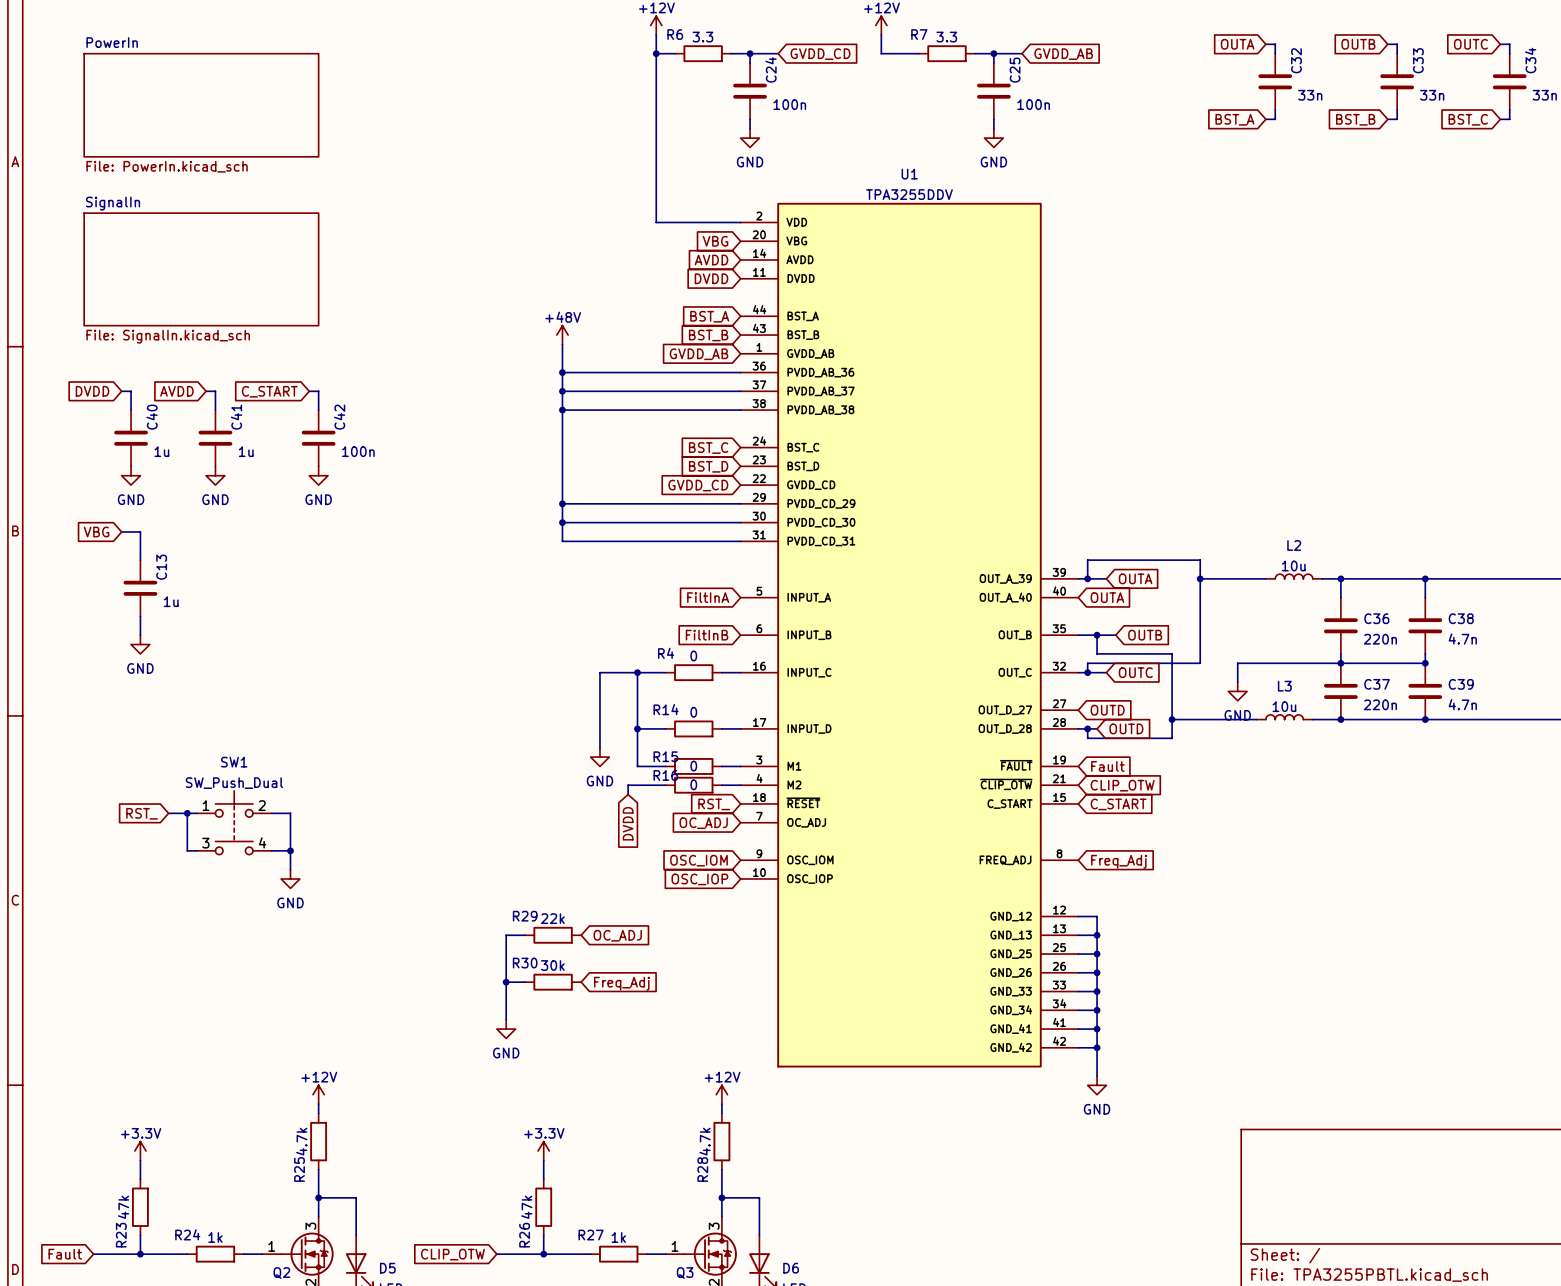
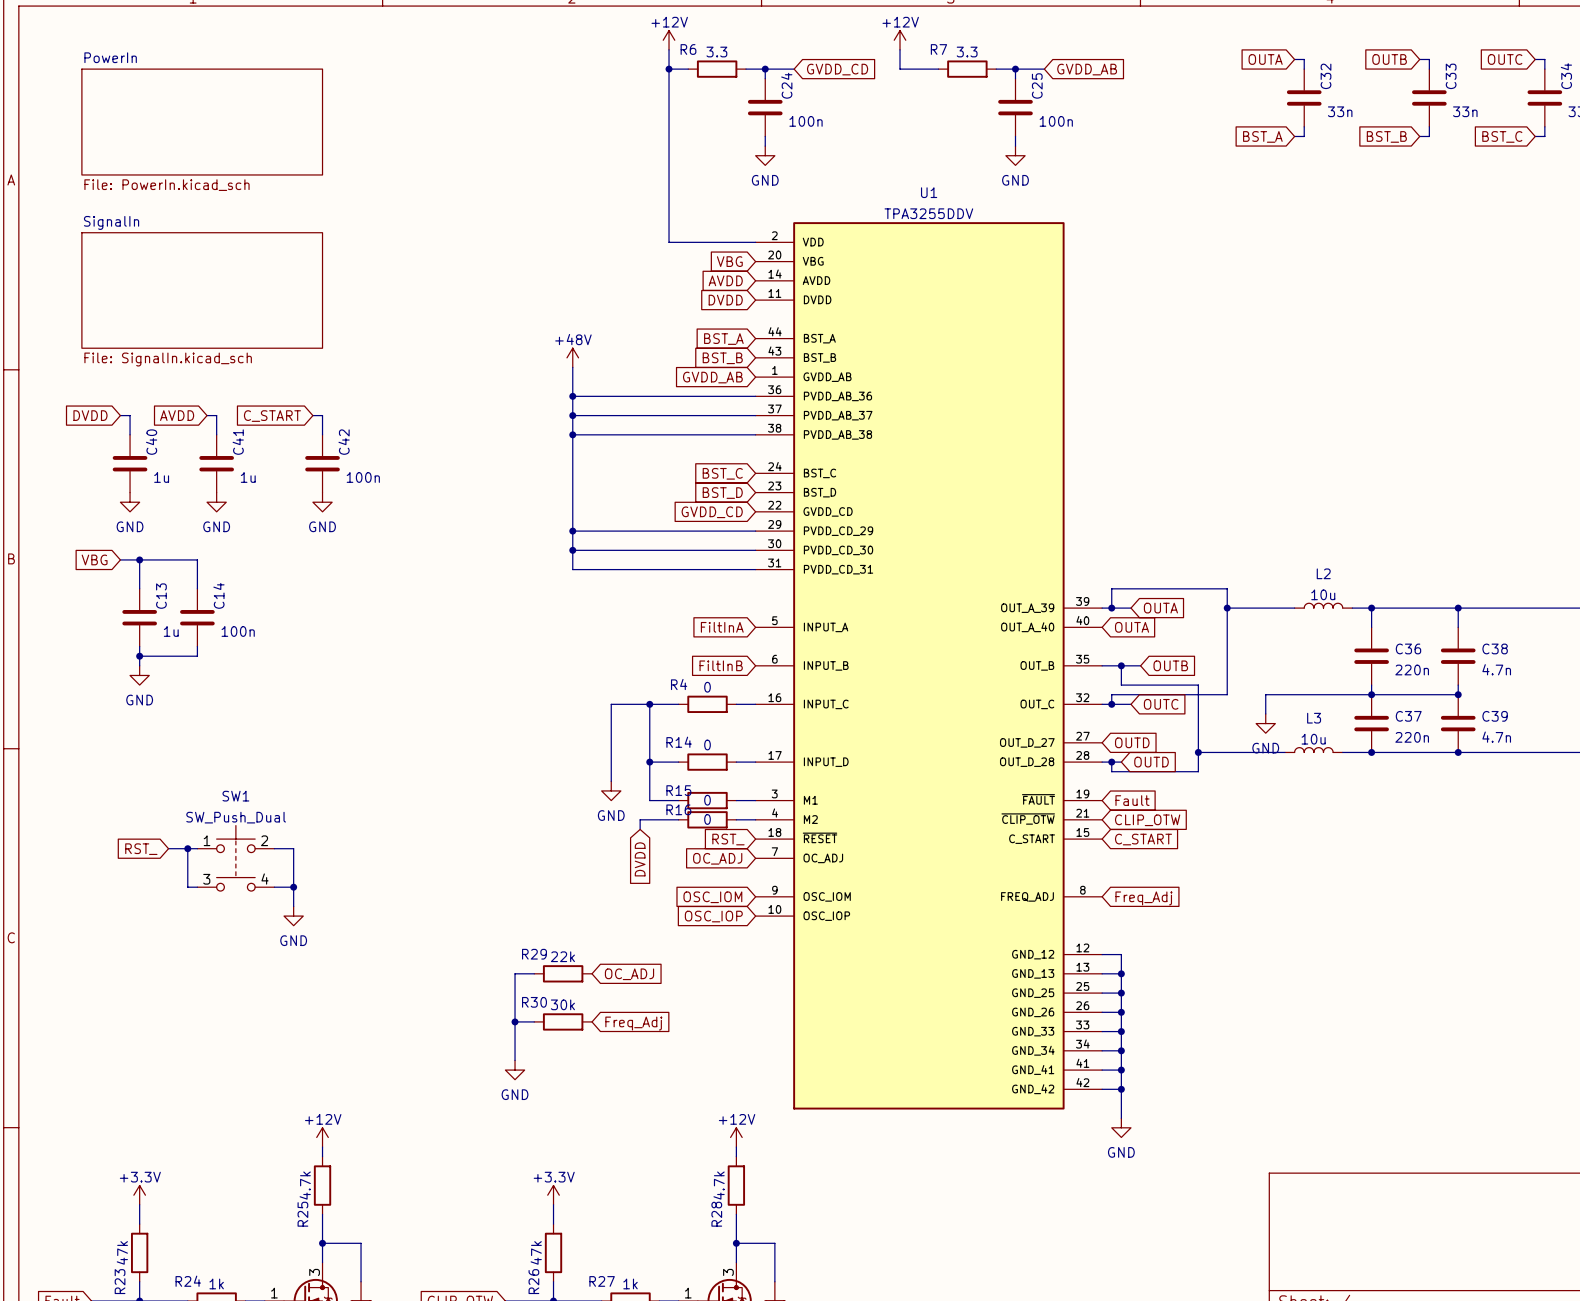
wire: none -> (139, 559) (197, 559) (197, 588)
junction: none -> (139, 559)
C14: none -> 100n (197, 617)
wire: none -> (197, 646) (197, 656) (139, 656)
junction: none -> (139, 656)

